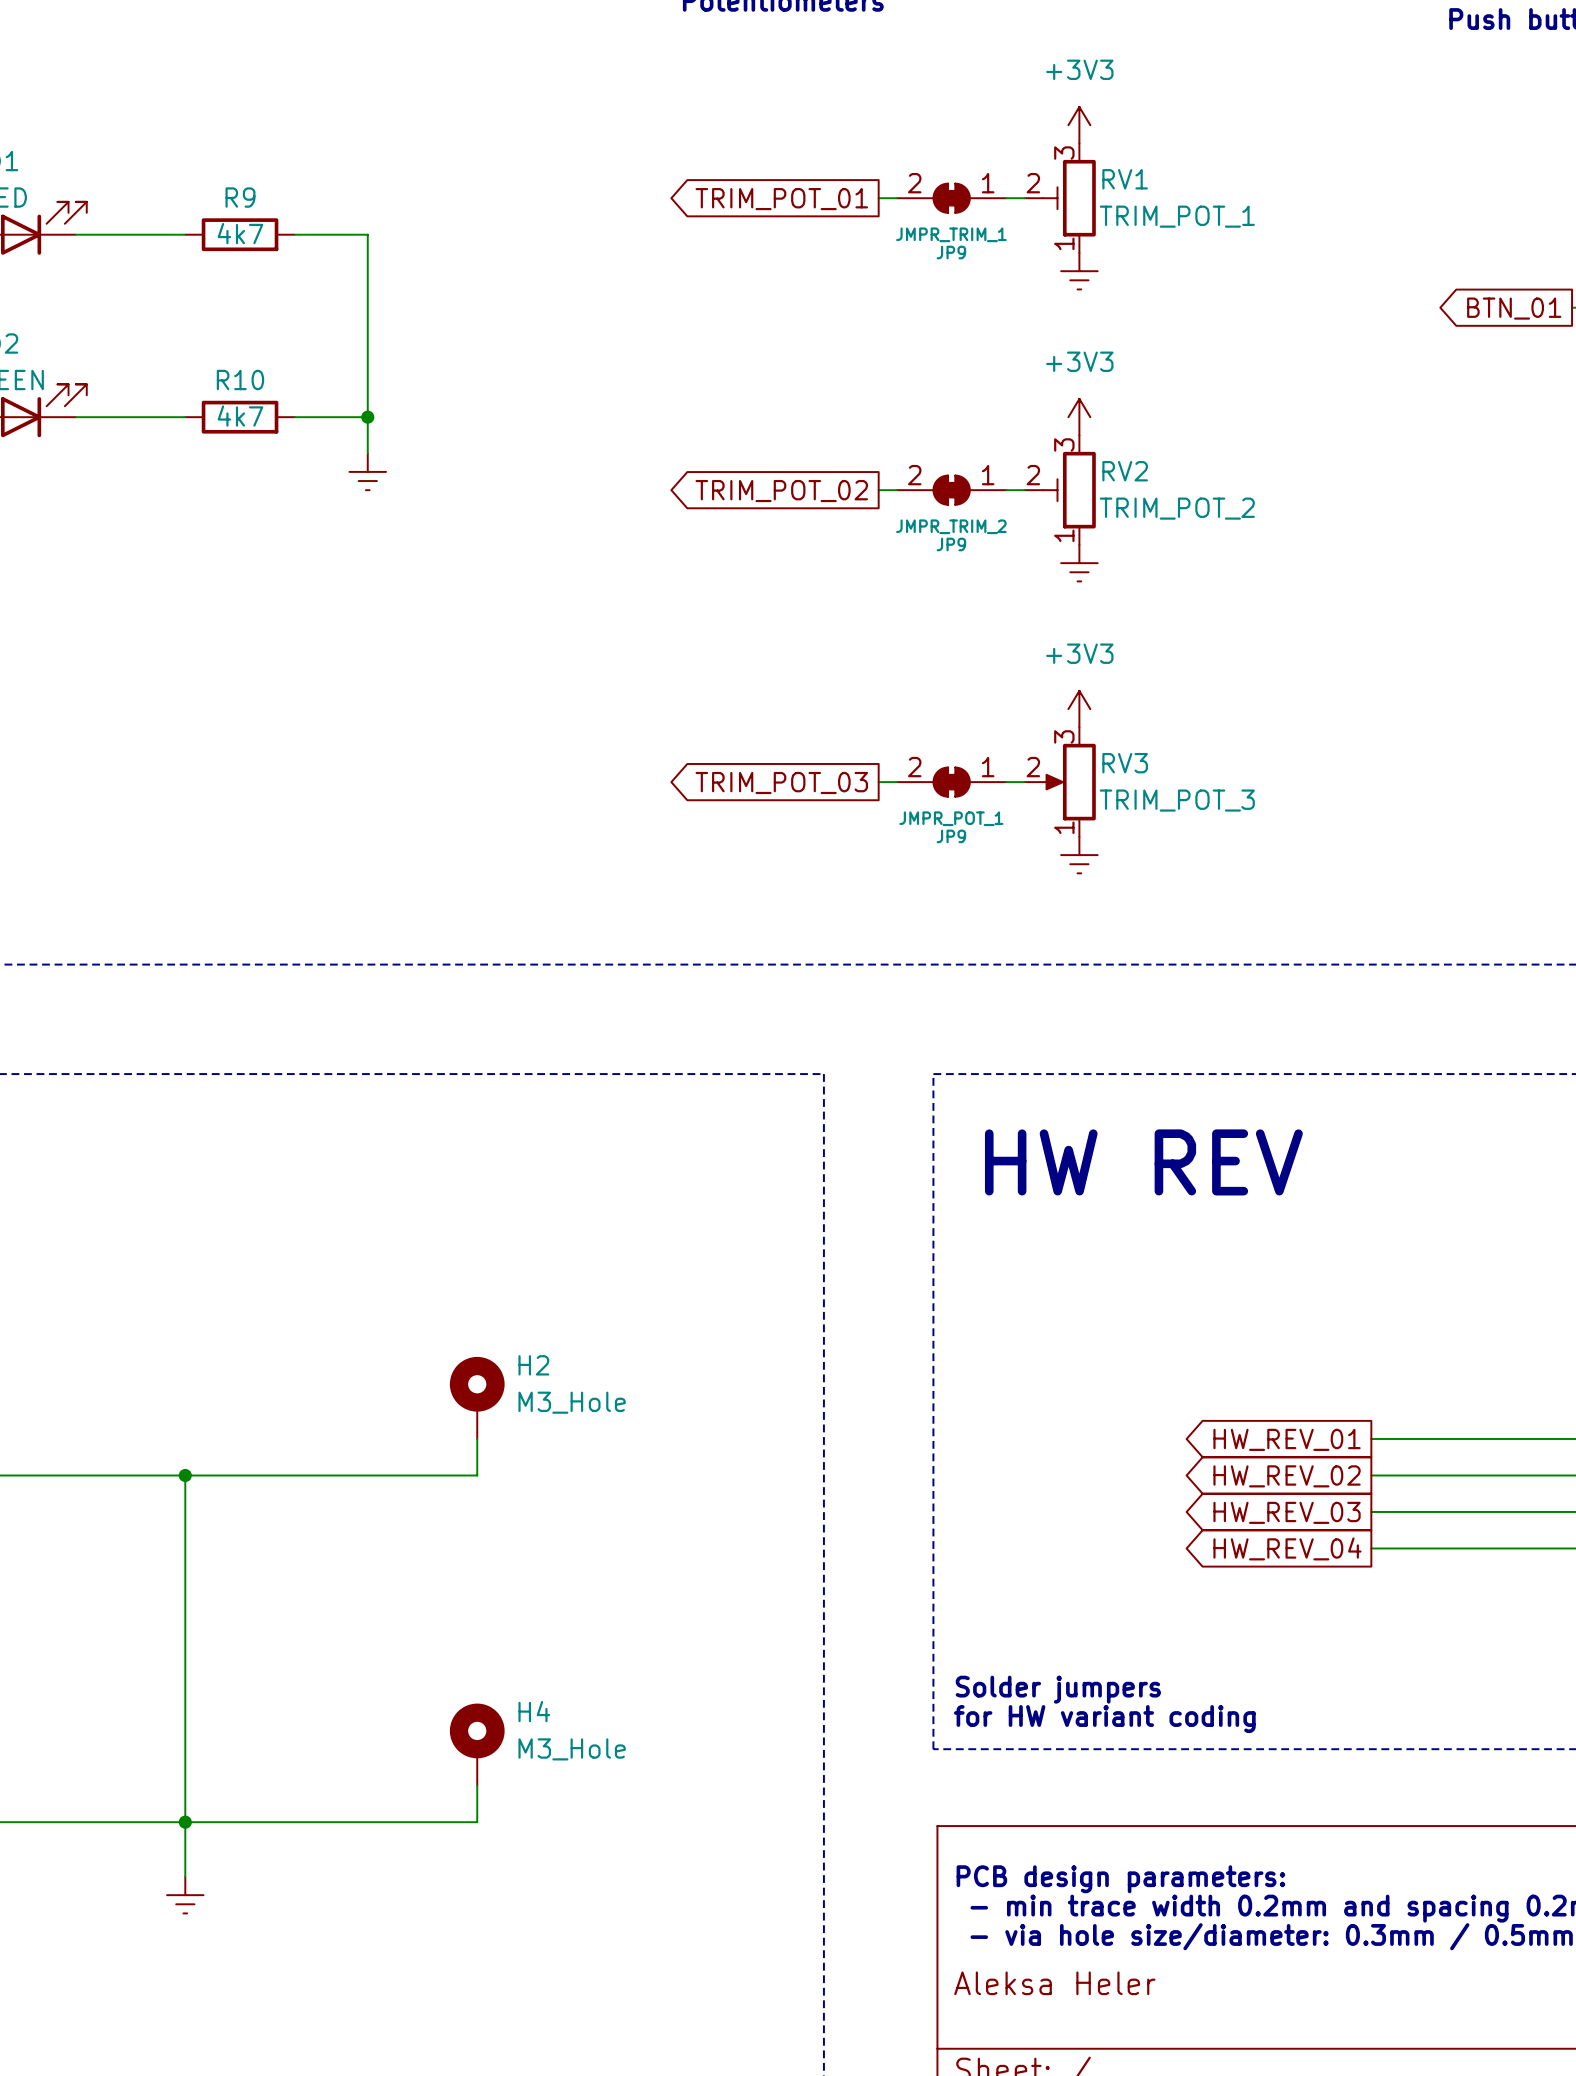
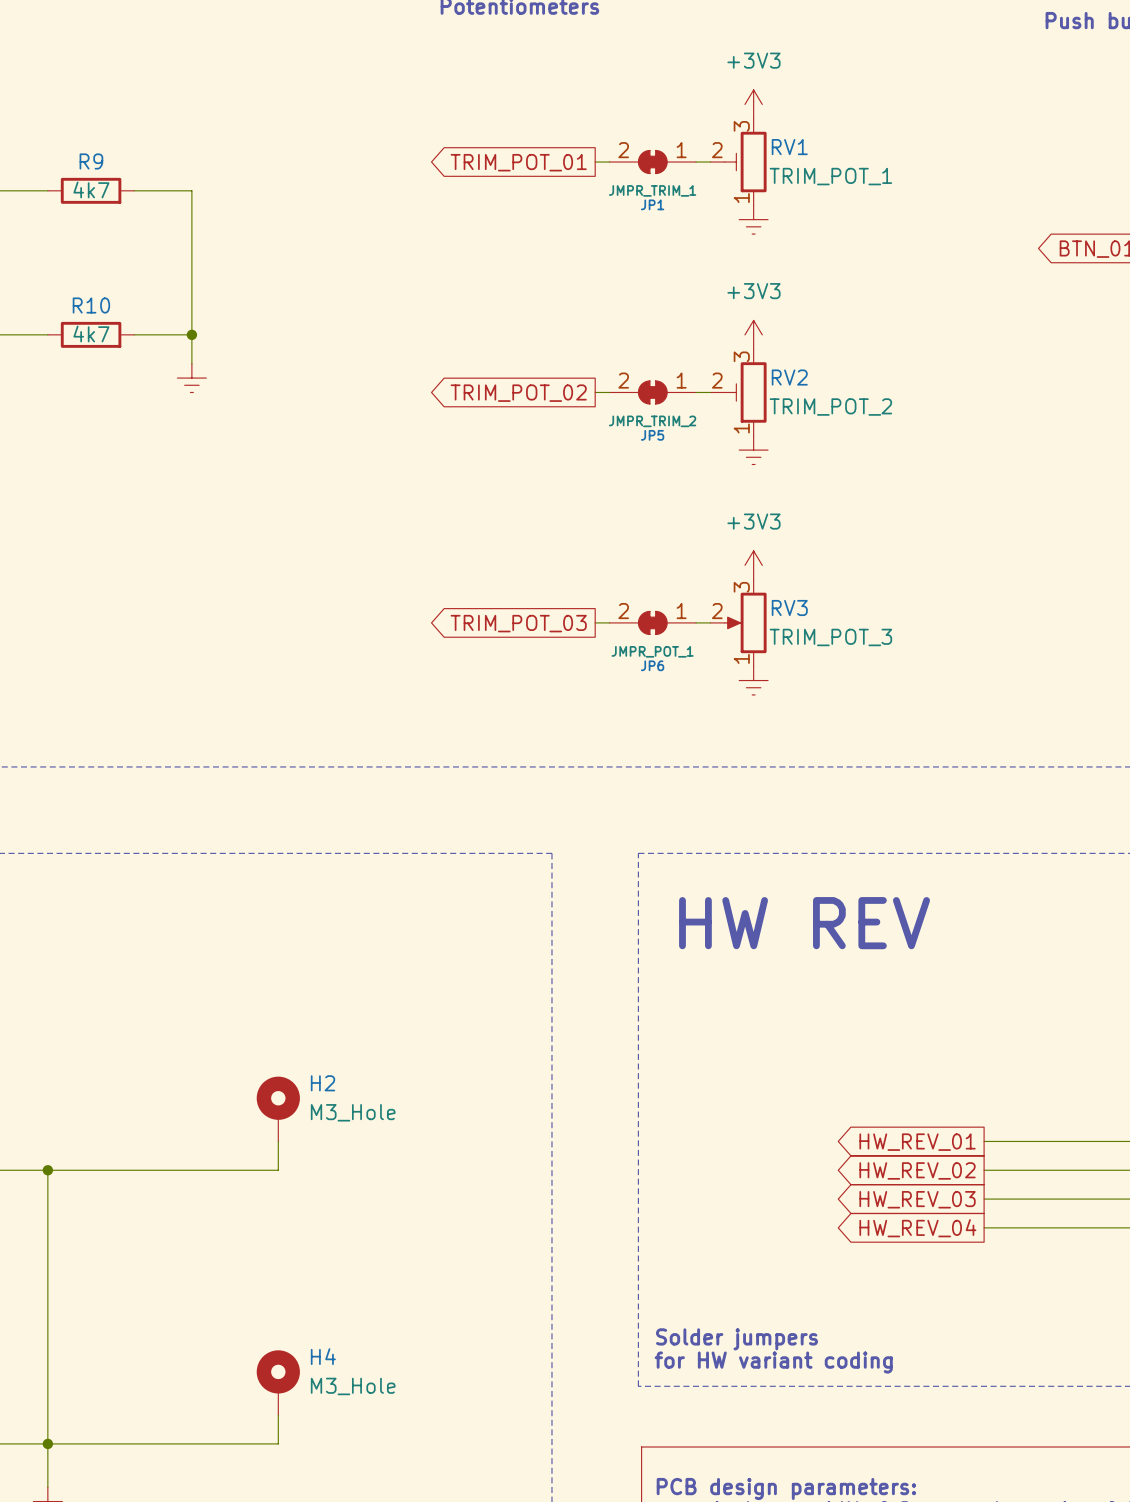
JP9 name: JP9 (951, 252) -> JP1 (652, 204)
JP9 name: JP9 (951, 544) -> JP5 (652, 435)
JP9 name: JP9 (951, 836) -> JP6 (652, 665)

